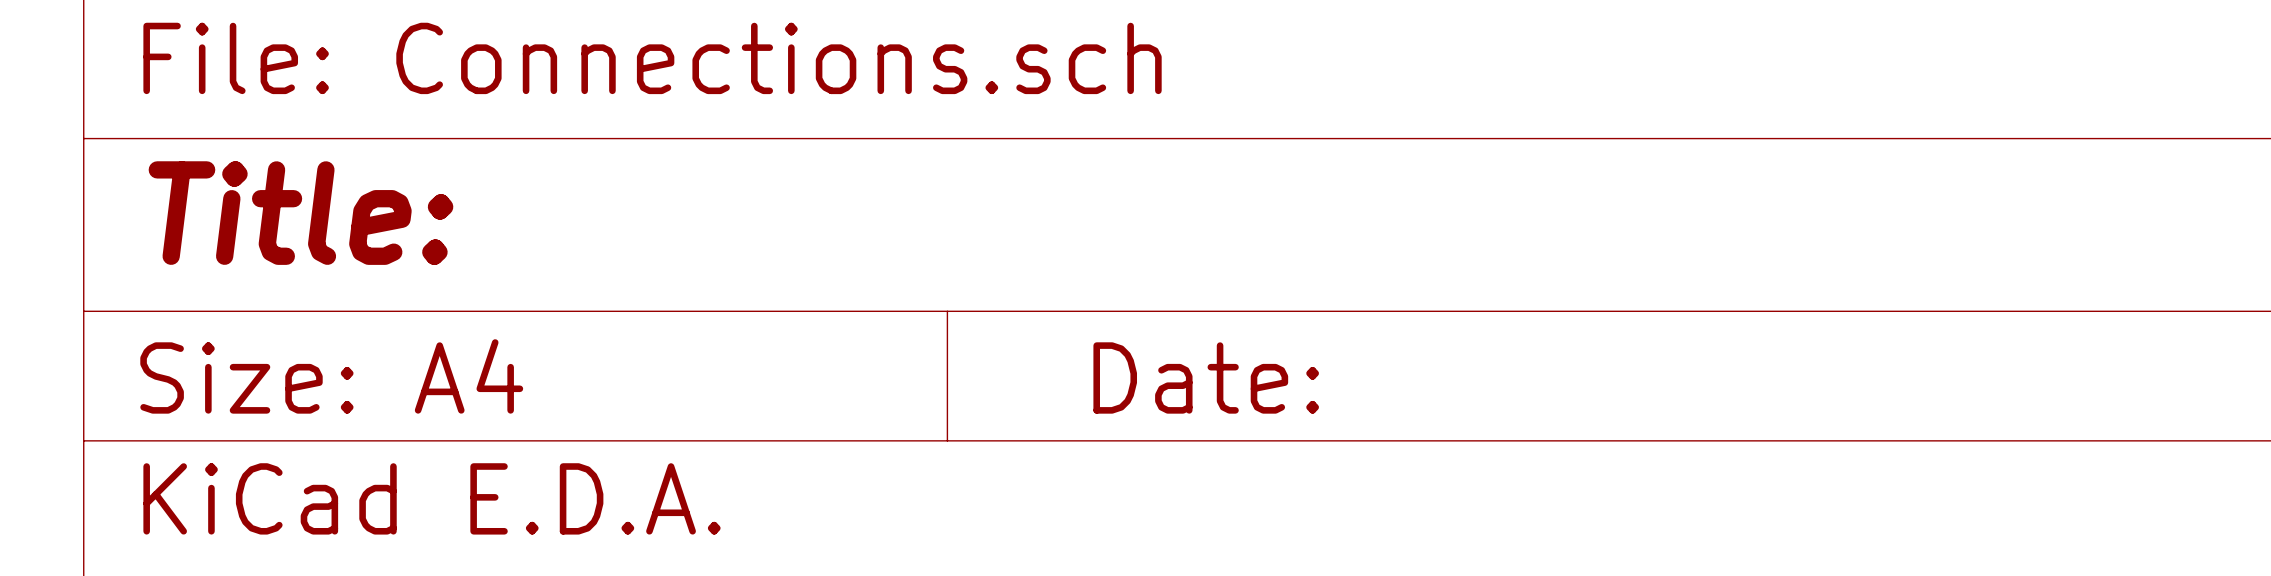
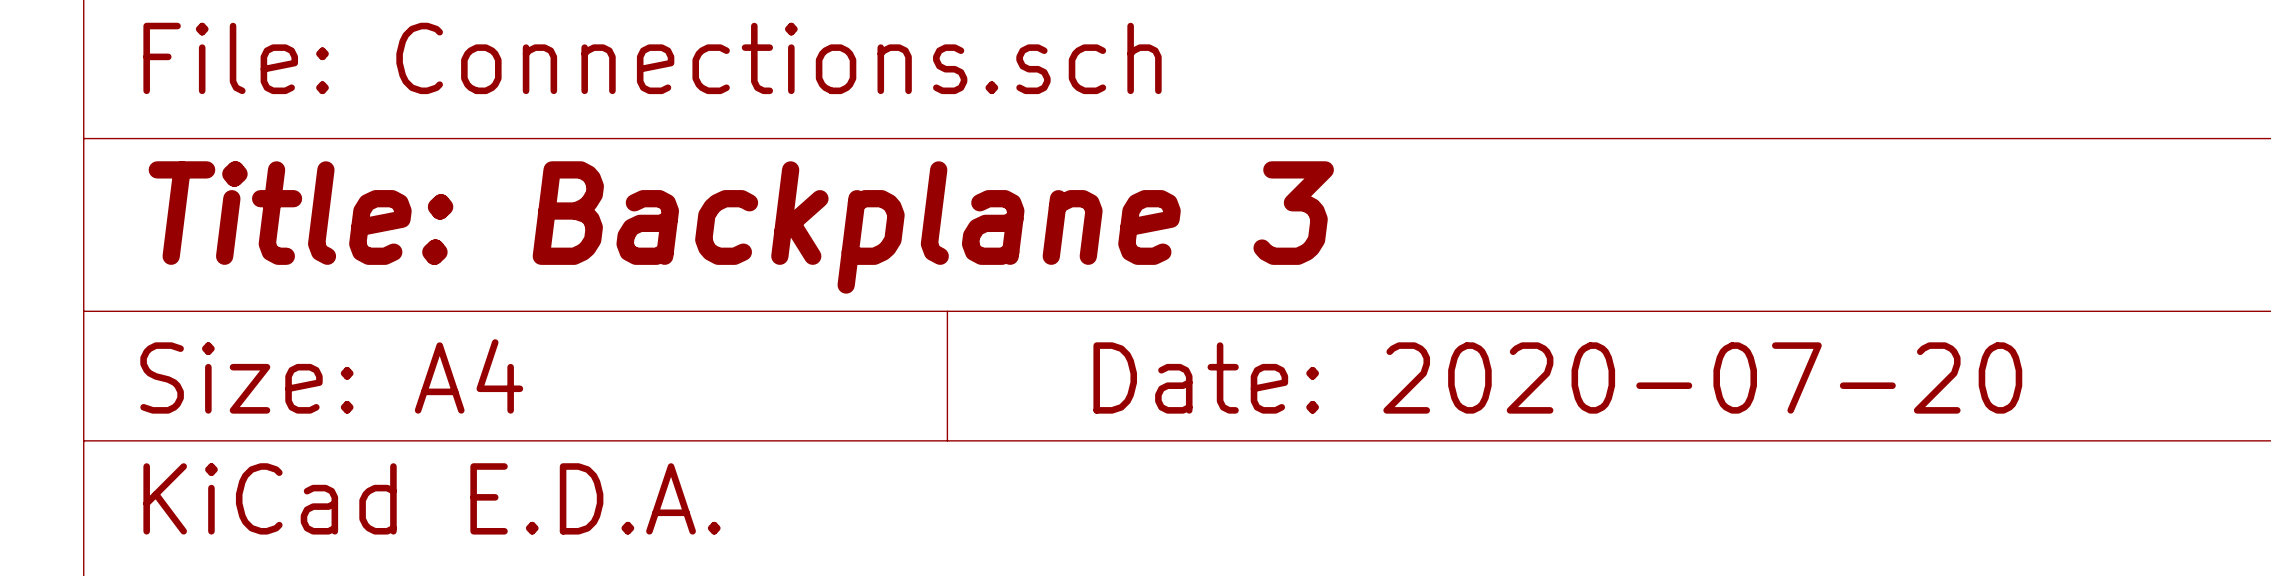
title block: Title: (300, 213) -> Title: Backplane 3 (741, 227)
title block: Date: (1206, 377) -> Date: 2020-07-20 (1557, 377)

